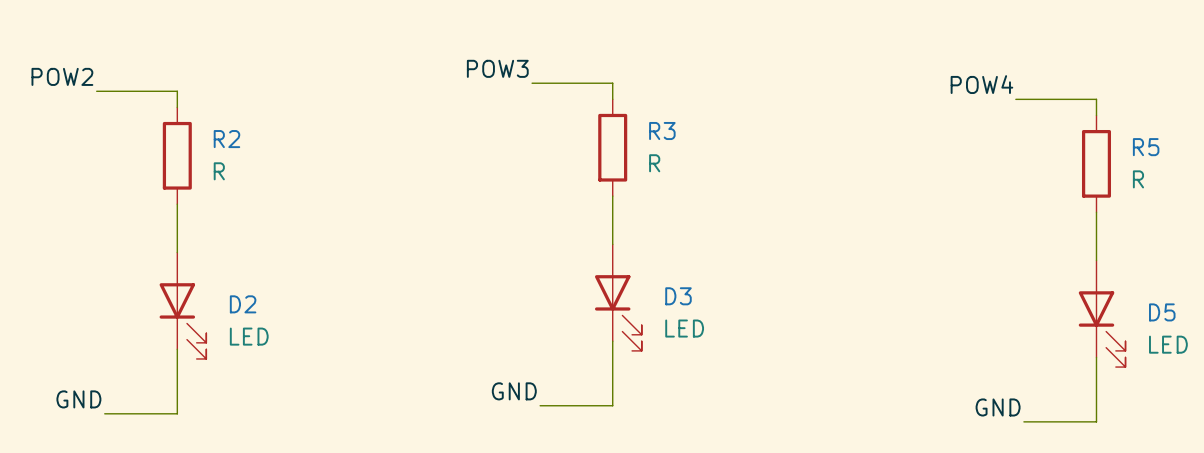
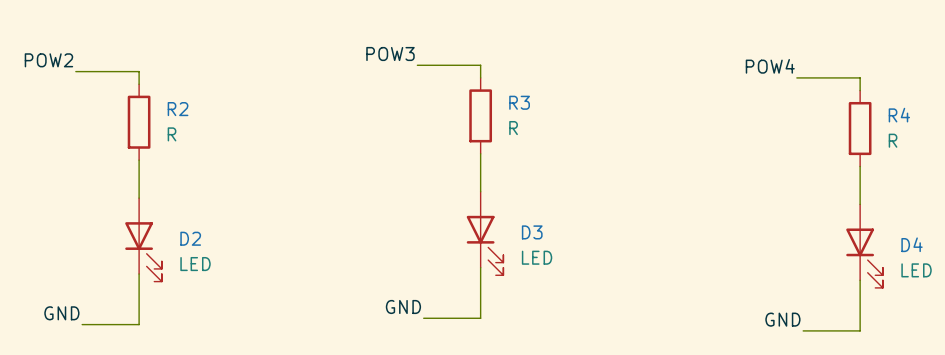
R5 name: R5 (1146, 147) -> R4 (899, 115)
D5 name: D5 (1162, 312) -> D4 (912, 244)

